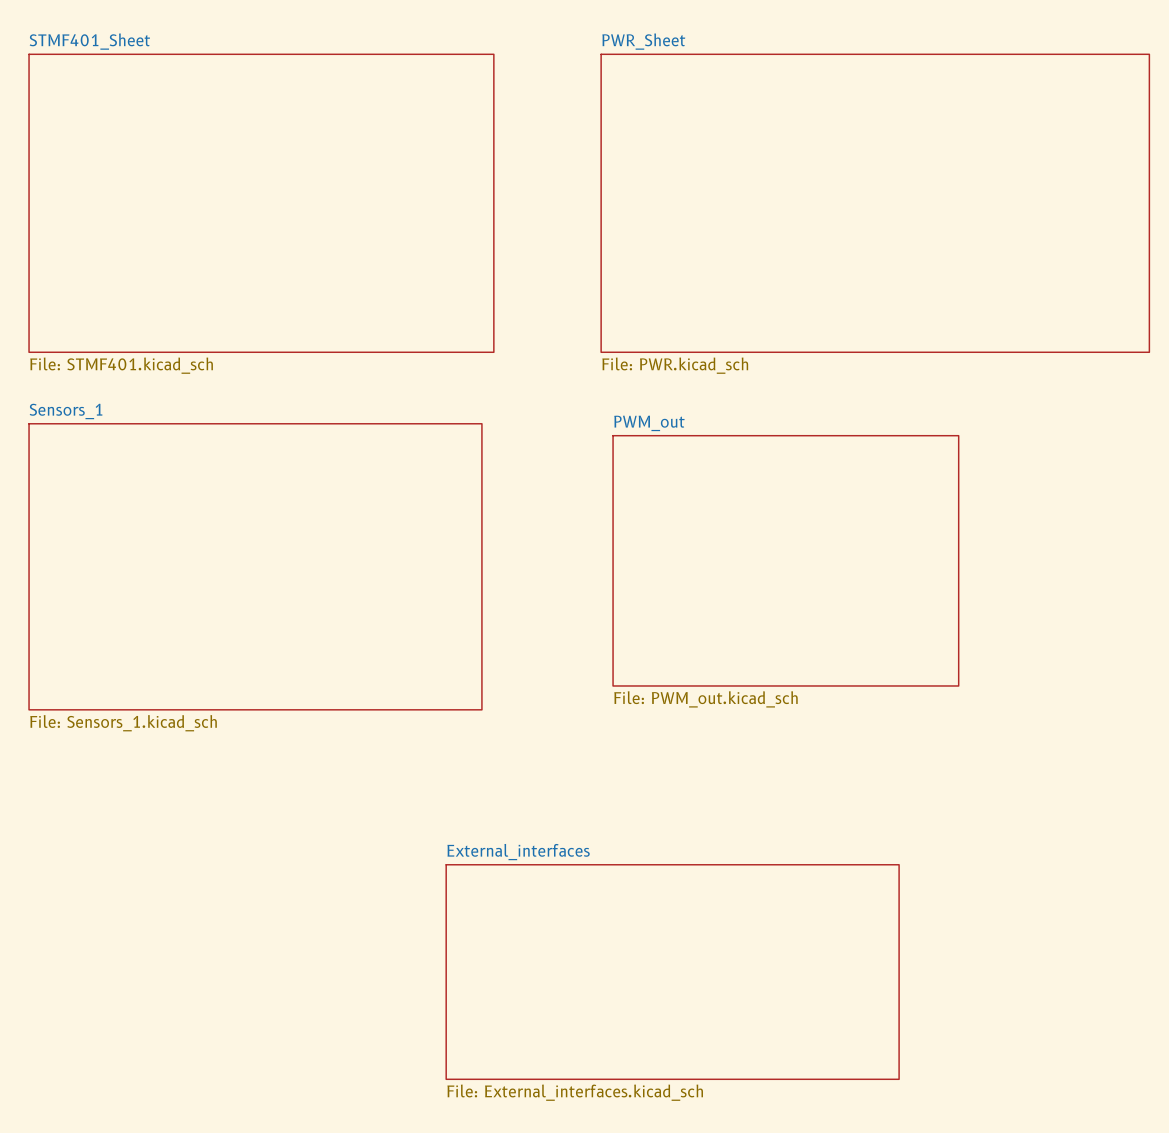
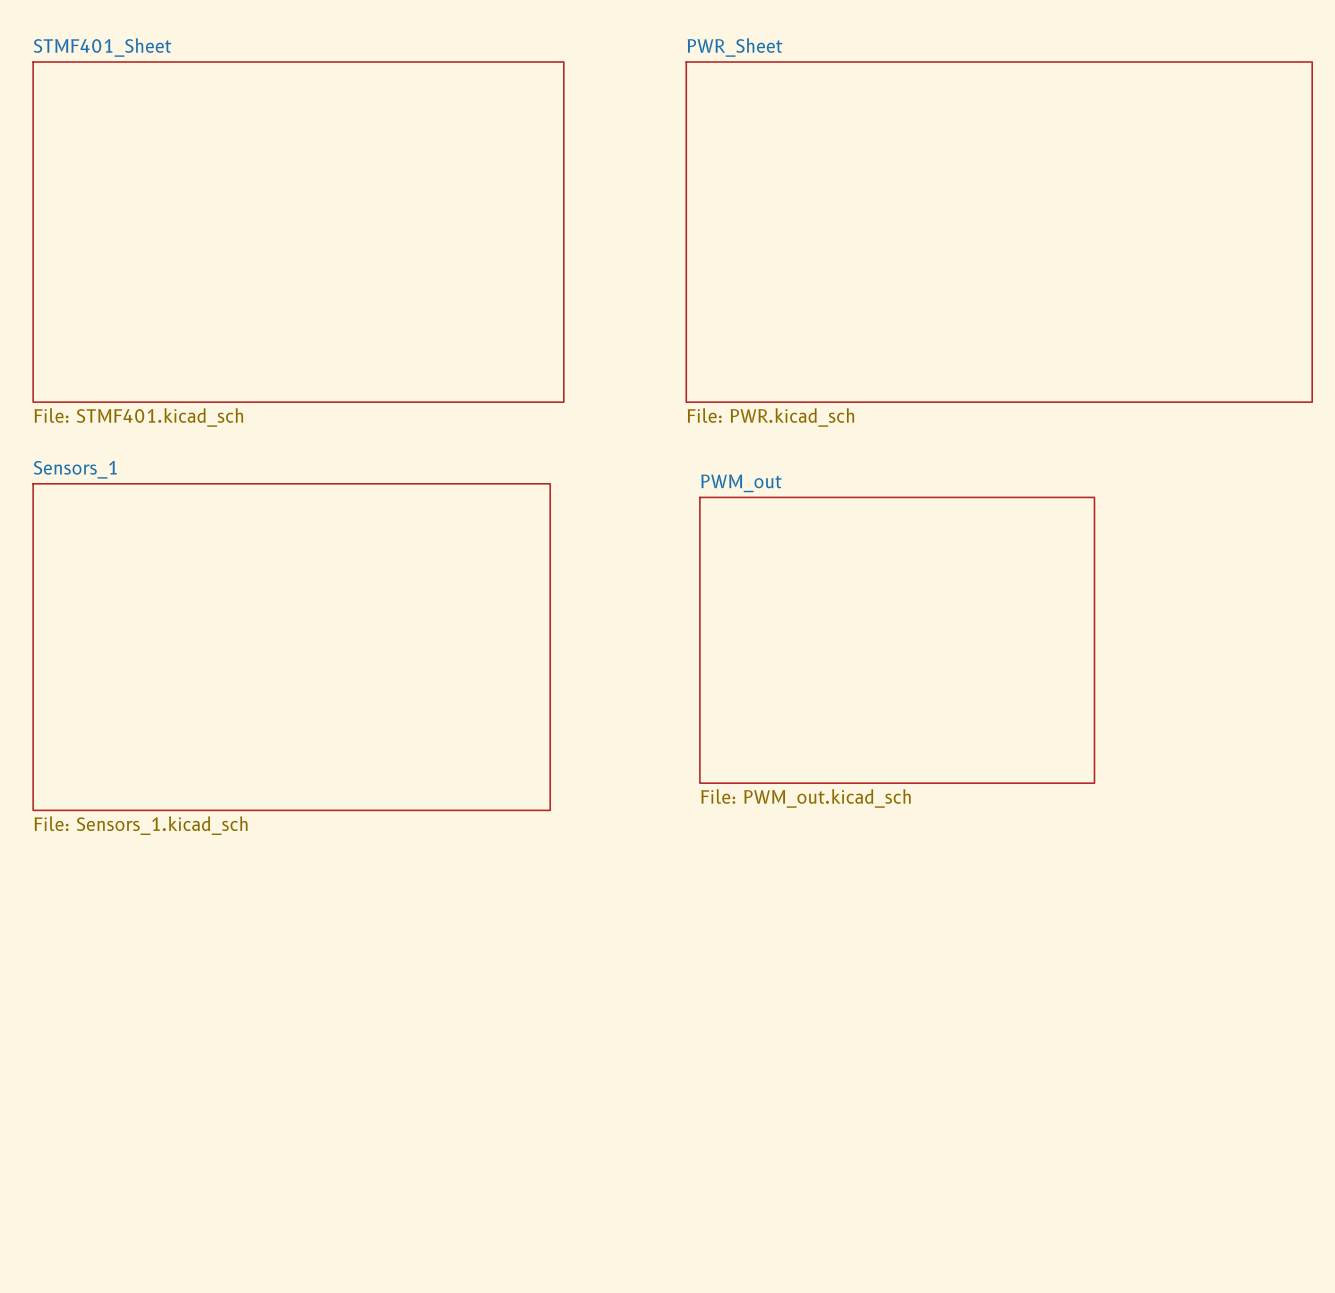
sheet External_interfaces: File: External_interfaces.kicad_sch (672, 972) -> none

